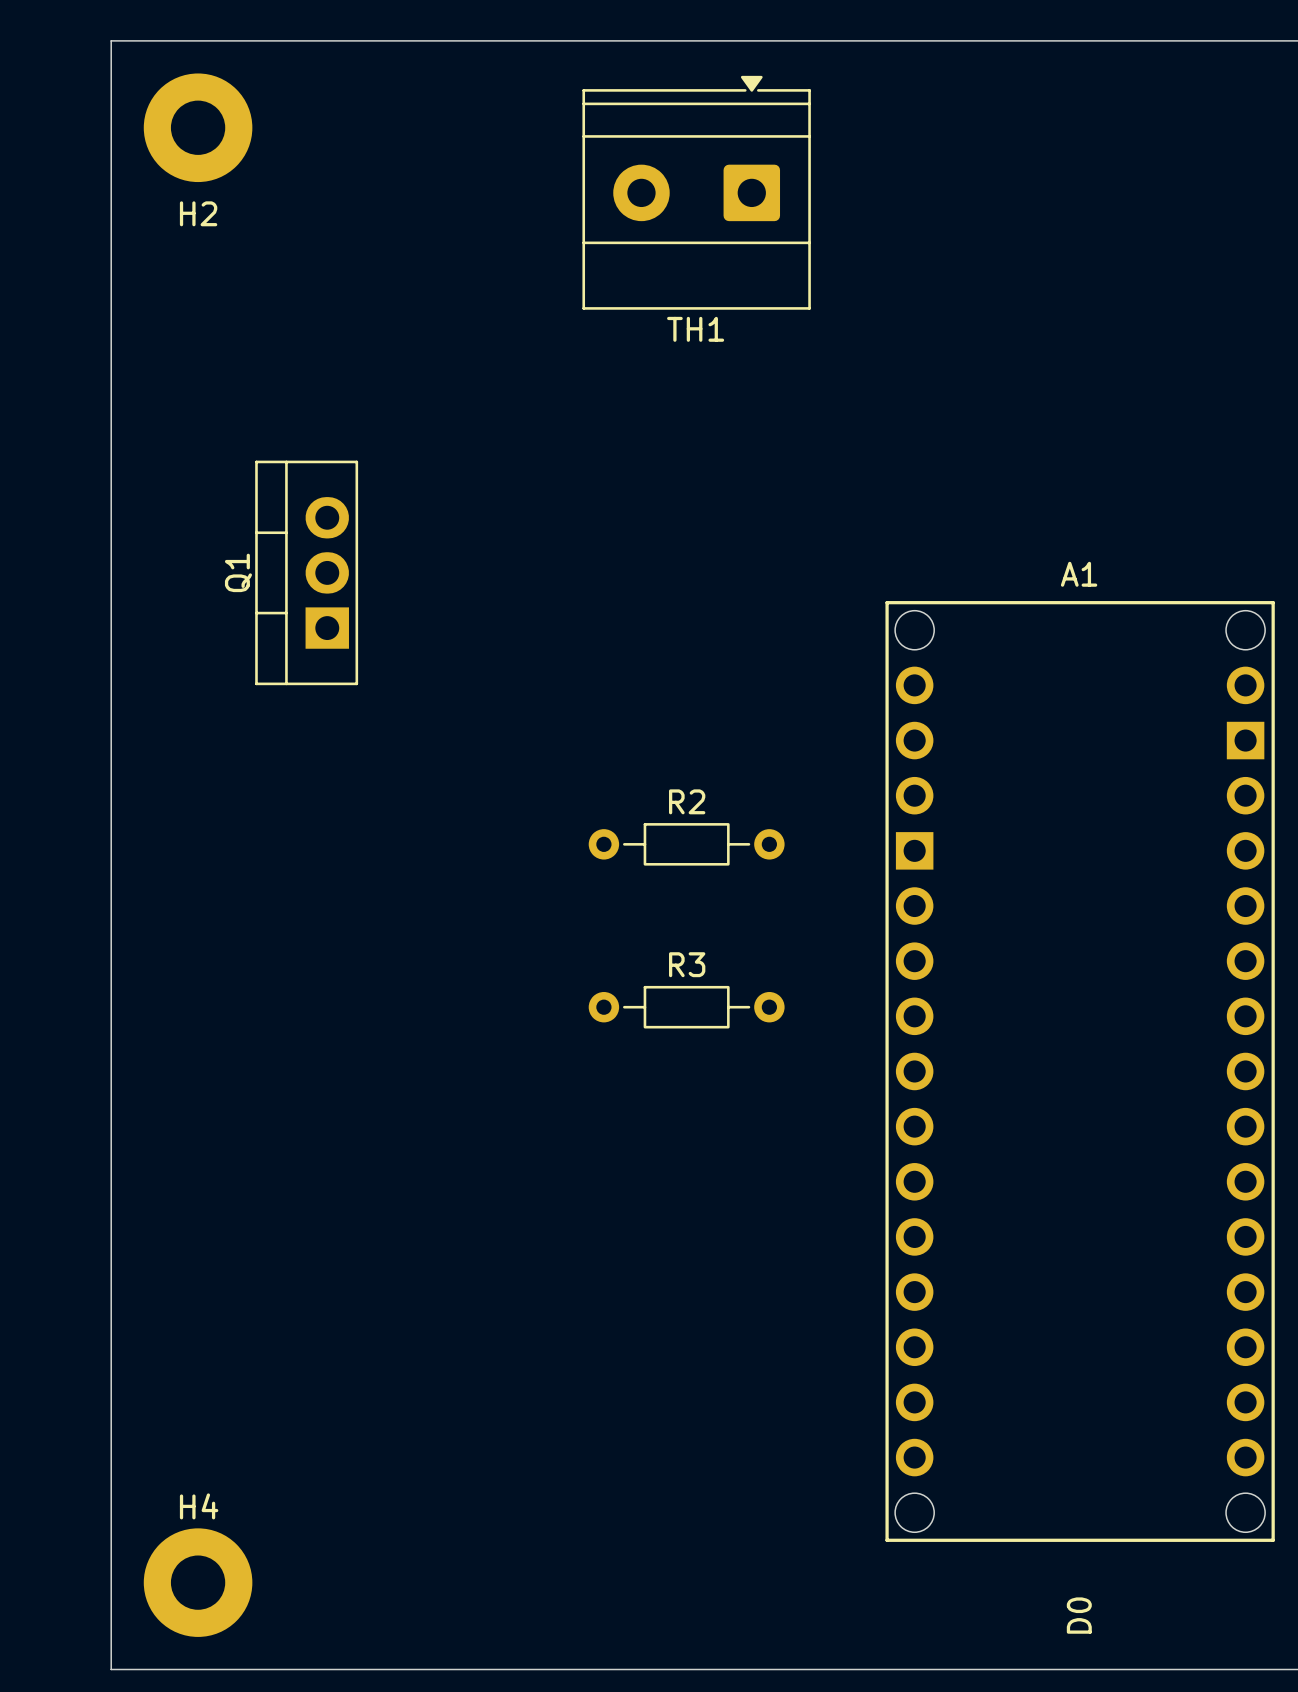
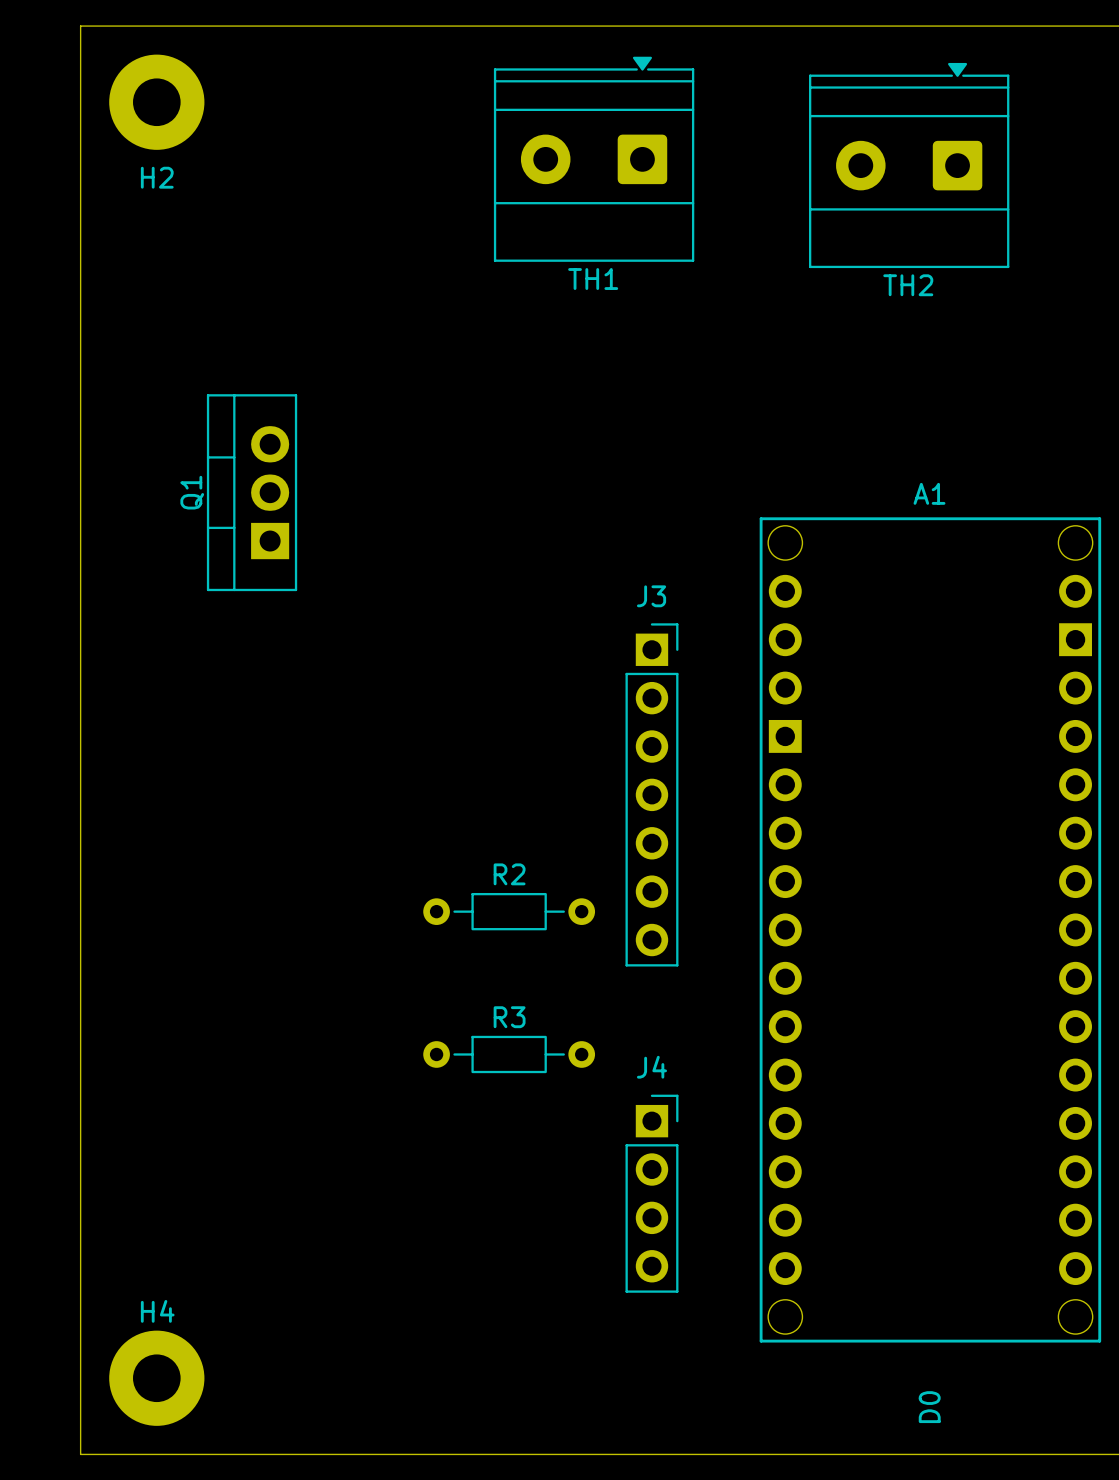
TH2: none -> (909, 165)
R2 position: (686, 844) -> (509, 911)
J3: none -> (651, 794)
R3 position: (686, 1007) -> (509, 1054)
J4: none -> (651, 1193)

